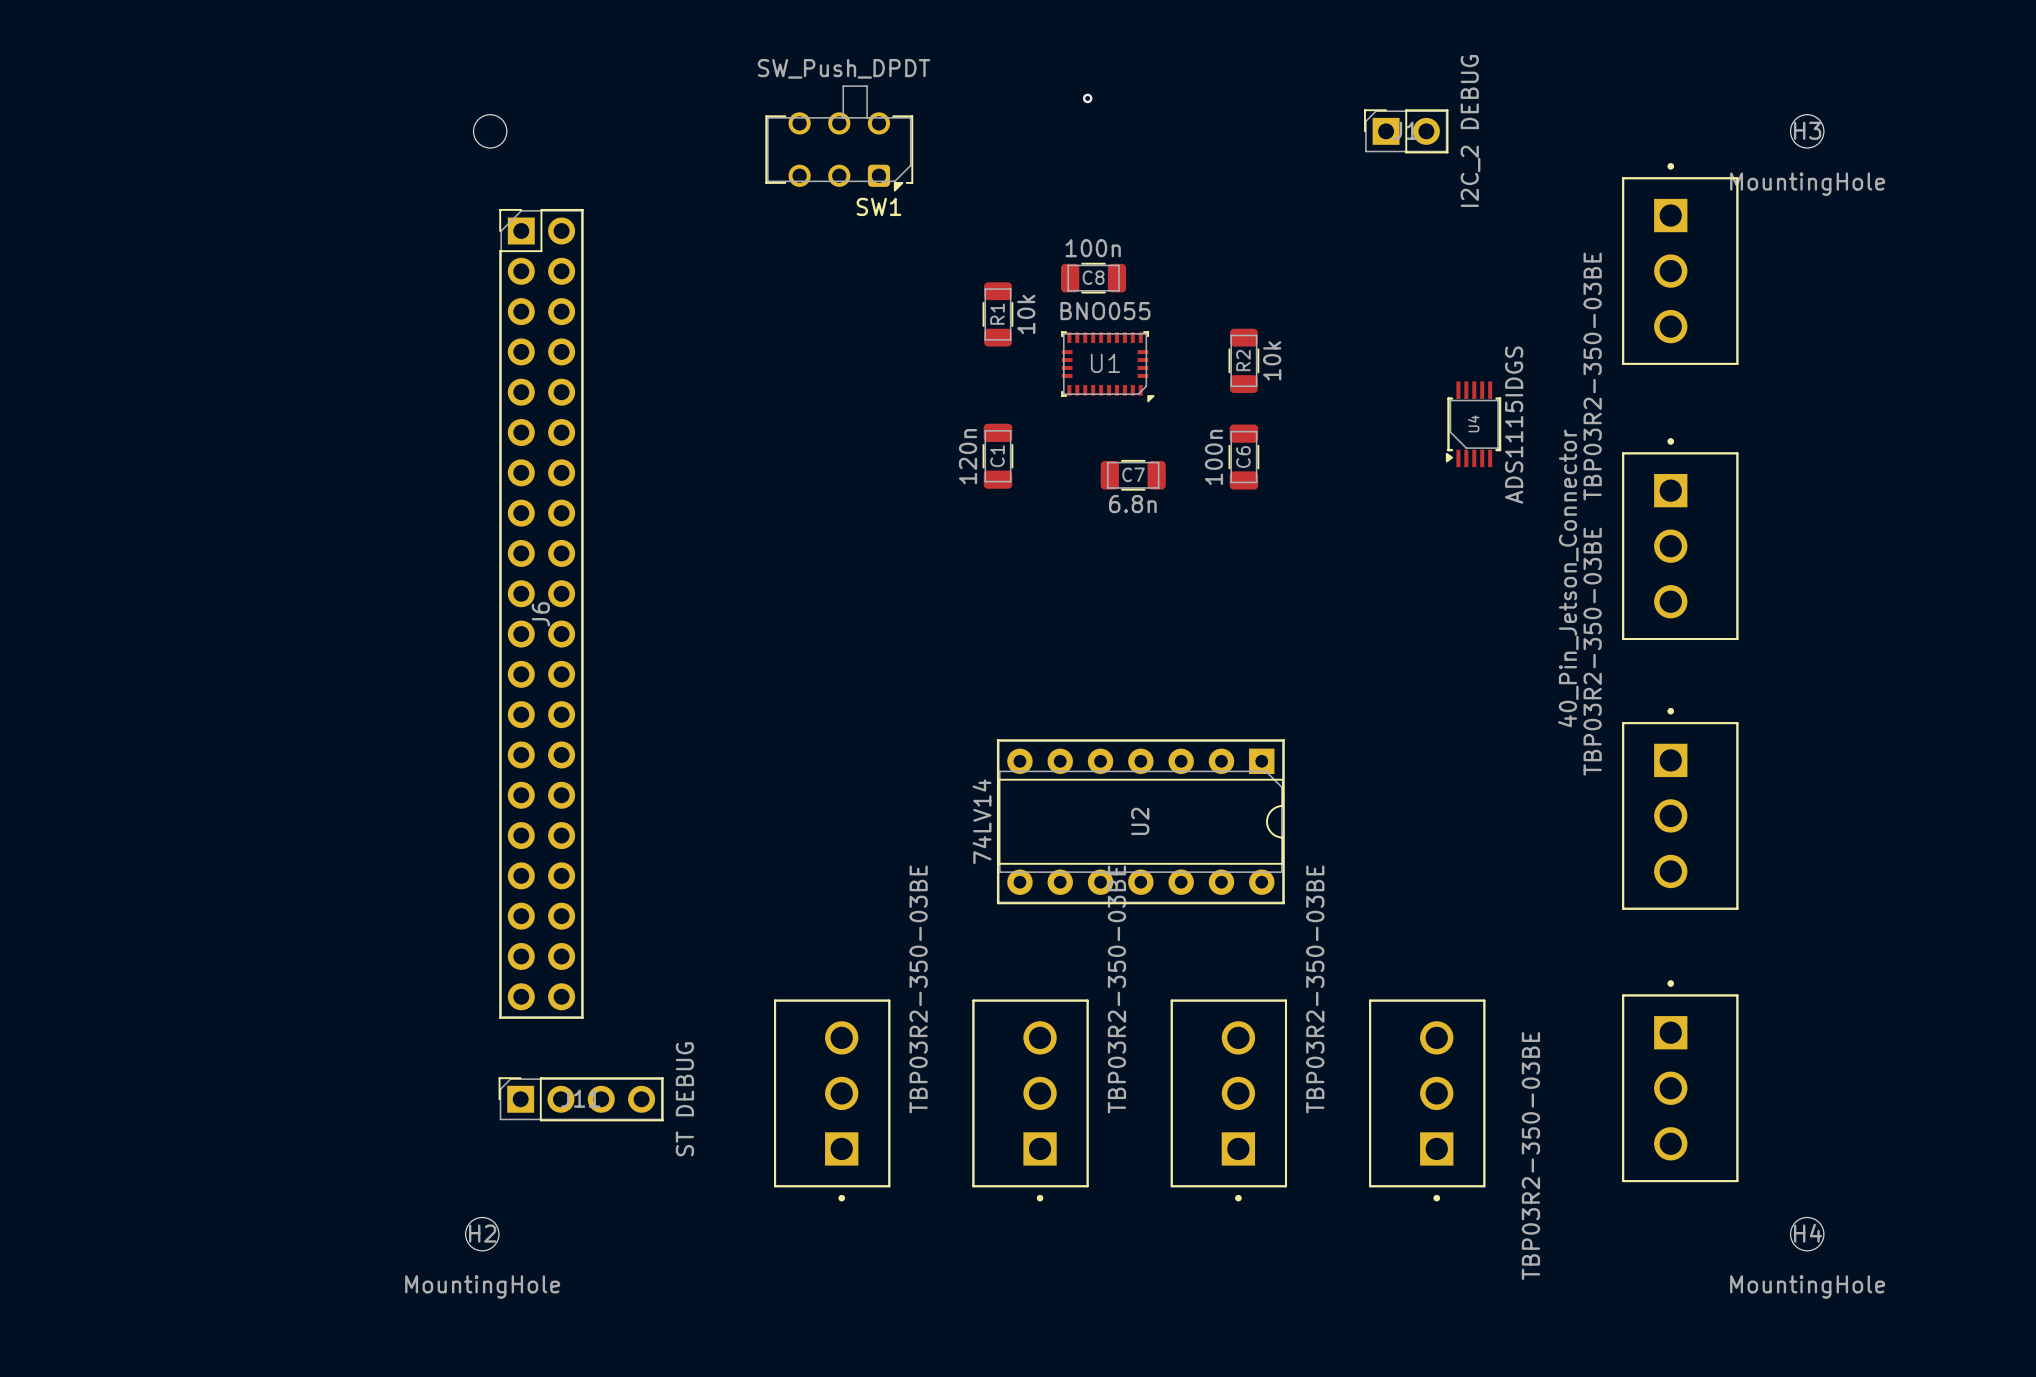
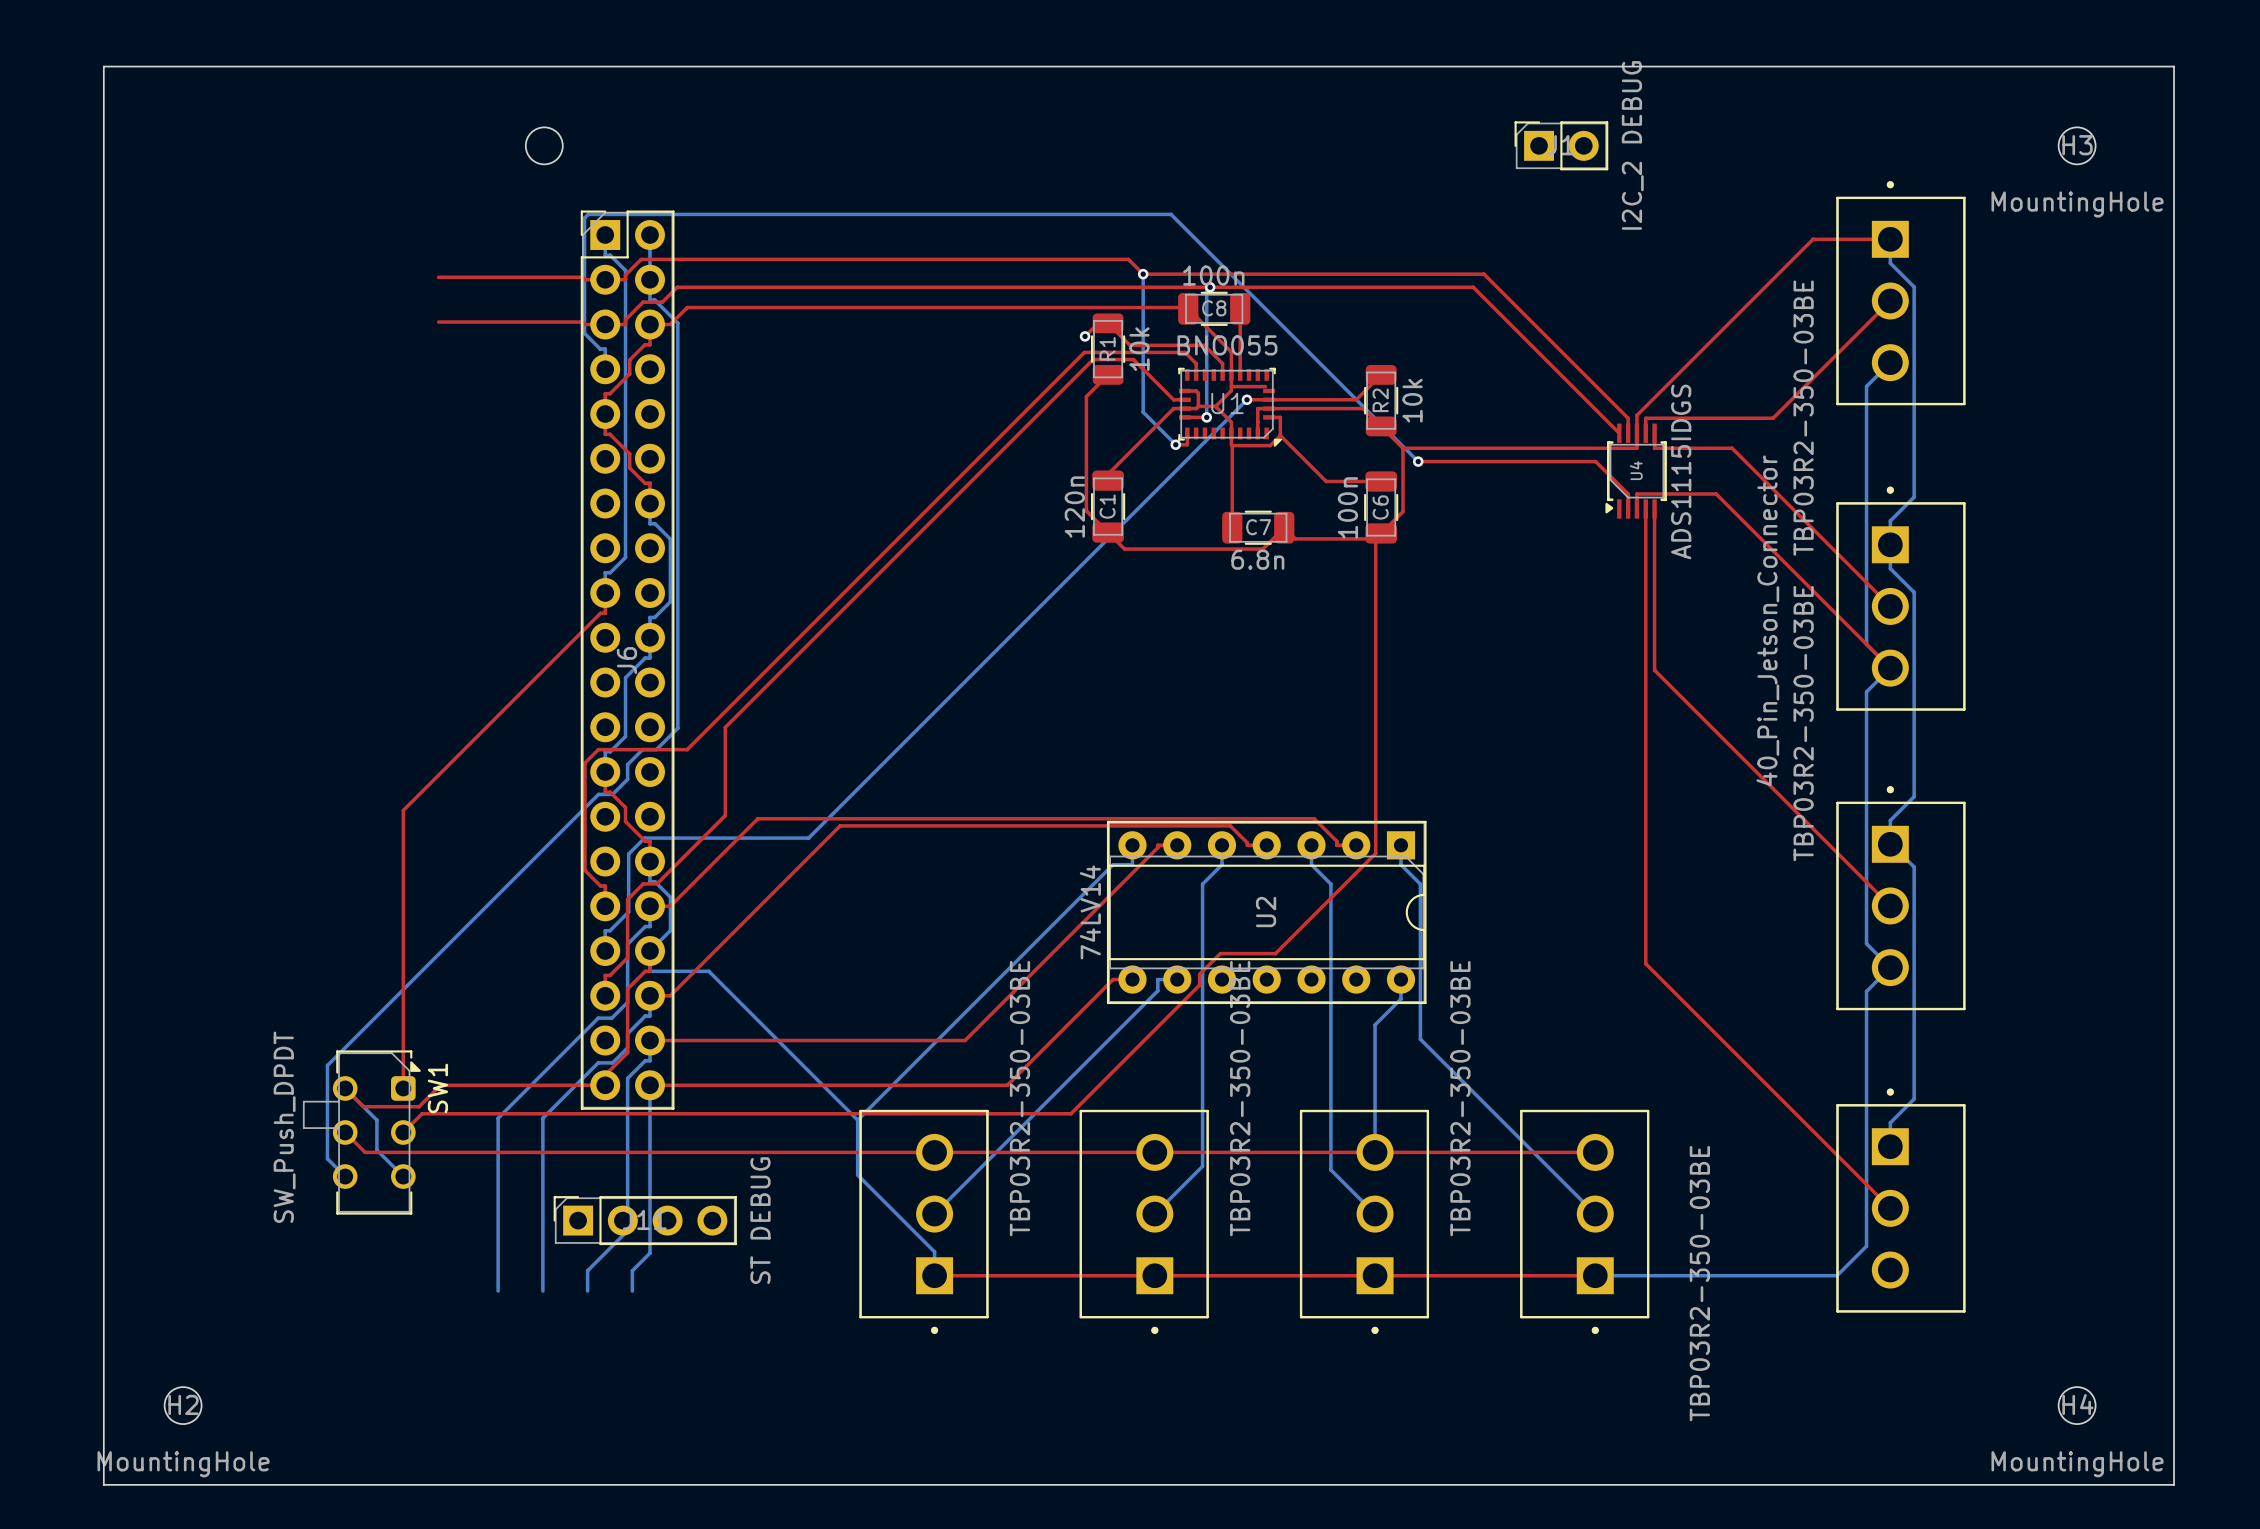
board edge: none -> (103, 66) (2174, 66) (2174, 1484) (103, 1484) (103, 66)
via: (1087, 98) -> none
H3 position: (1807, 131) -> (2077, 145)
SW1 rotation: 0° (839, 138) -> 90° counterclockwise (361, 1132)
SW1 position: (839, 138) -> (361, 1132)
bottom track: none -> (605, 235) (605, 255) (610, 255) (625, 270) (625, 557) (610, 572) (605, 572) (605, 593)
bottom track: none -> (650, 235) (650, 300) (654, 300) (677, 323) (677, 728) (656, 749) (642, 749) (627, 764) (627, 779) (612, 794) (598, 794) (327, 1065) (327, 1158) (345, 1176)
top track: none -> (1890, 239) (1813, 239) (1636, 415) (1636, 448) (1403, 448)
bottom track: none -> (1890, 239) (1890, 263) (1914, 286) (1914, 497) (1890, 520) (1890, 568) (1914, 592) (1914, 796) (1890, 820) (1890, 844)
bottom track: none -> (1143, 274) (1143, 412) (1175, 444)
via: none -> (1143, 274)
top track: none -> (438, 277) (582, 277) (584, 279) (625, 279) (625, 275) (641, 259) (1128, 259) (1143, 274) (1484, 274) (1628, 418) (1628, 433)
bottom track: none -> (1210, 287) (1206, 290) (1206, 417)
via: none -> (1210, 287)
part position: (1680, 264) -> (1900, 293)
top track: none -> (1890, 300) (1773, 418) (1645, 418) (1645, 433)
top track: none -> (1240, 308) (1240, 374)
top track: none -> (438, 322) (582, 322) (584, 324) (625, 324) (625, 319) (643, 302) (662, 302) (677, 287) (1473, 287) (1619, 433)
top track: none -> (1085, 336) (1098, 323) (1108, 323) (1130, 345) (1204, 345) (1222, 363) (1222, 374)
via: none -> (1085, 336)
bottom track: none -> (1890, 362) (1866, 386) (1866, 644) (1890, 668) (1866, 691) (1866, 943) (1890, 967) (1866, 991) (1866, 1246) (1836, 1275) (1595, 1275)
bottom track: none -> (605, 369) (605, 348) (600, 348) (584, 333) (584, 218) (588, 214) (1171, 214) (1418, 461)
top track: none -> (1108, 374) (1086, 396) (1086, 510) (1124, 549) (1262, 549) (1284, 527) (1295, 538) (1375, 538)
top track: none -> (1196, 374) (1196, 363) (1184, 352) (1084, 352) (687, 749) (598, 749) (584, 763) (584, 870) (600, 885) (605, 885) (605, 906)
top track: none -> (1381, 374) (1356, 399) (1246, 399)
top track: none -> (1231, 386) (1265, 386)
top track: none -> (1184, 390) (1196, 390) (1198, 393) (1198, 406)
top track: none -> (1184, 399) (1173, 399) (1133, 359) (1093, 359) (725, 727) (725, 815) (656, 883) (643, 883) (627, 899) (627, 957) (609, 975) (605, 975) (605, 995)
bottom track: none -> (1246, 399) (808, 838) (644, 838) (628, 854) (628, 912) (609, 930) (605, 930) (605, 951)
via: none -> (1246, 399)
top track: none -> (1198, 406) (1215, 406)
top track: none -> (1198, 406) (1196, 408) (1173, 408) (1108, 474) (1108, 480)
top track: none -> (1215, 406) (1231, 390) (1231, 352) (1186, 307) (687, 307) (670, 324) (650, 324) (650, 344) (644, 344) (629, 360) (629, 373) (609, 393) (605, 393) (605, 434) (609, 434) (629, 454) (629, 468) (644, 483) (650, 483) (650, 503)
top track: none -> (1215, 406) (1231, 422) (1232, 445)
top track: none -> (1184, 417) (1206, 417)
via: none -> (1206, 417)
top track: none -> (1269, 417) (1280, 417) (1280, 435)
top track: none -> (1187, 433) (1187, 444) (1175, 444)
top track: none -> (1257, 433) (1257, 408) (1363, 408) (1403, 448)
top track: none -> (1654, 433) (1654, 448) (1732, 448) (1890, 606)
top track: none -> (1280, 435) (1326, 481) (1381, 481)
top track: none -> (1280, 435) (1270, 445) (1232, 445)
via: none -> (1175, 444)
top track: none -> (1232, 445) (1232, 527)
top track: none -> (1403, 448) (1403, 511) (1375, 538)
top track: none -> (1418, 461) (1595, 461) (1628, 494) (1628, 509)
via: none -> (1418, 461)
bottom track: none -> (650, 503) (650, 523) (655, 523) (670, 539) (670, 601) (654, 617) (650, 617) (650, 658) (645, 658) (625, 677) (625, 736) (610, 751) (605, 751) (605, 772)
top track: none -> (1636, 509) (1636, 494) (1716, 494) (1890, 668)
top track: none -> (1645, 509) (1645, 963) (1890, 1208)
top track: none -> (1654, 509) (1654, 670) (1890, 905)
top track: none -> (1375, 538) (1375, 853) (1275, 953) (1220, 953) (1199, 974) (1199, 985) (1070, 1113) (422, 1113) (403, 1132)
top track: none -> (605, 593) (605, 613) (600, 613) (403, 810) (403, 1088)
part position: (1680, 539) -> (1900, 598)
J6 position: (541, 613) -> (627, 660)
top track: none -> (605, 772) (605, 792) (610, 792) (625, 807) (625, 821) (645, 841) (650, 841) (650, 861)
bottom track: none -> (1890, 843) (1914, 867) (1914, 1099) (1890, 1122) (1890, 1146)
bottom track: none -> (1132, 845) (1132, 864) (1113, 864) (857, 1120)
top track: none -> (1177, 845) (1157, 845) (1157, 847) (965, 1040) (650, 1040)
bottom track: none -> (1221, 845) (1221, 864) (1202, 884) (1202, 1166) (1154, 1214)
top track: none -> (1266, 845) (1247, 845) (1247, 842) (1230, 825) (840, 825) (670, 995) (650, 995)
bottom track: none -> (1311, 845) (1311, 864) (1330, 884) (1330, 1169) (1375, 1214)
top track: none -> (1356, 845) (1336, 845) (1336, 841) (1314, 818) (757, 818) (670, 906) (650, 906)
bottom track: none -> (1400, 845) (1400, 864) (1420, 884) (1420, 1039) (1595, 1214)
bottom track: none -> (650, 861) (650, 881) (655, 881) (670, 897) (670, 930) (650, 951) (650, 971) (708, 971) (857, 1120)
part position: (1680, 808) -> (1900, 898)
bottom track: none -> (650, 906) (650, 926) (645, 926) (627, 944) (627, 1002) (611, 1018) (598, 1018) (498, 1118) (498, 1291)
top track: none -> (650, 951) (650, 971) (645, 971) (627, 988) (627, 1052) (595, 1085)
top track: none -> (1132, 979) (1113, 979) (1007, 1085) (650, 1085)
bottom track: none -> (1177, 979) (1157, 979) (1157, 990) (934, 1214)
bottom track: none -> (1400, 979) (1400, 998) (1375, 1024) (1375, 1152)
bottom track: none -> (650, 995) (650, 1016) (645, 1016) (627, 1033) (627, 1047) (612, 1062) (598, 1062) (542, 1118) (542, 1291)
bottom track: none -> (650, 1040) (650, 1060) (645, 1060) (627, 1078) (627, 1230) (587, 1270) (587, 1291)
top track: none -> (605, 1085) (440, 1085) (419, 1106) (363, 1106) (345, 1088)
bottom track: none -> (650, 1085) (650, 1253) (632, 1270) (632, 1291)
bottom track: none -> (345, 1088) (376, 1120) (376, 1150) (403, 1176)
bottom track: none -> (857, 1120) (857, 1175) (934, 1251) (934, 1275)
top track: none -> (345, 1132) (365, 1152) (1595, 1152)
part position: (1680, 1081) -> (1900, 1200)
top track: none -> (934, 1275) (1595, 1275)
H2 position: (482, 1234) -> (183, 1405)
H4 position: (1807, 1234) -> (2077, 1405)

